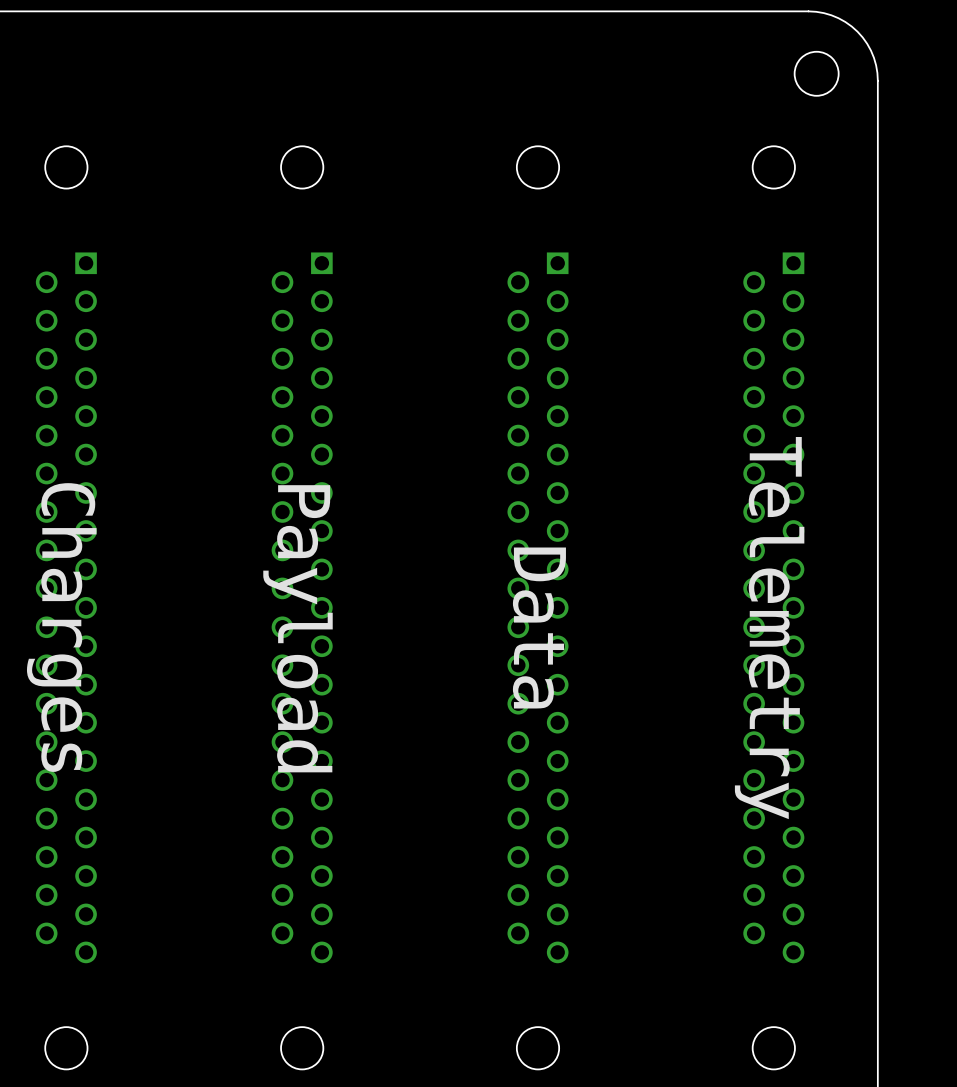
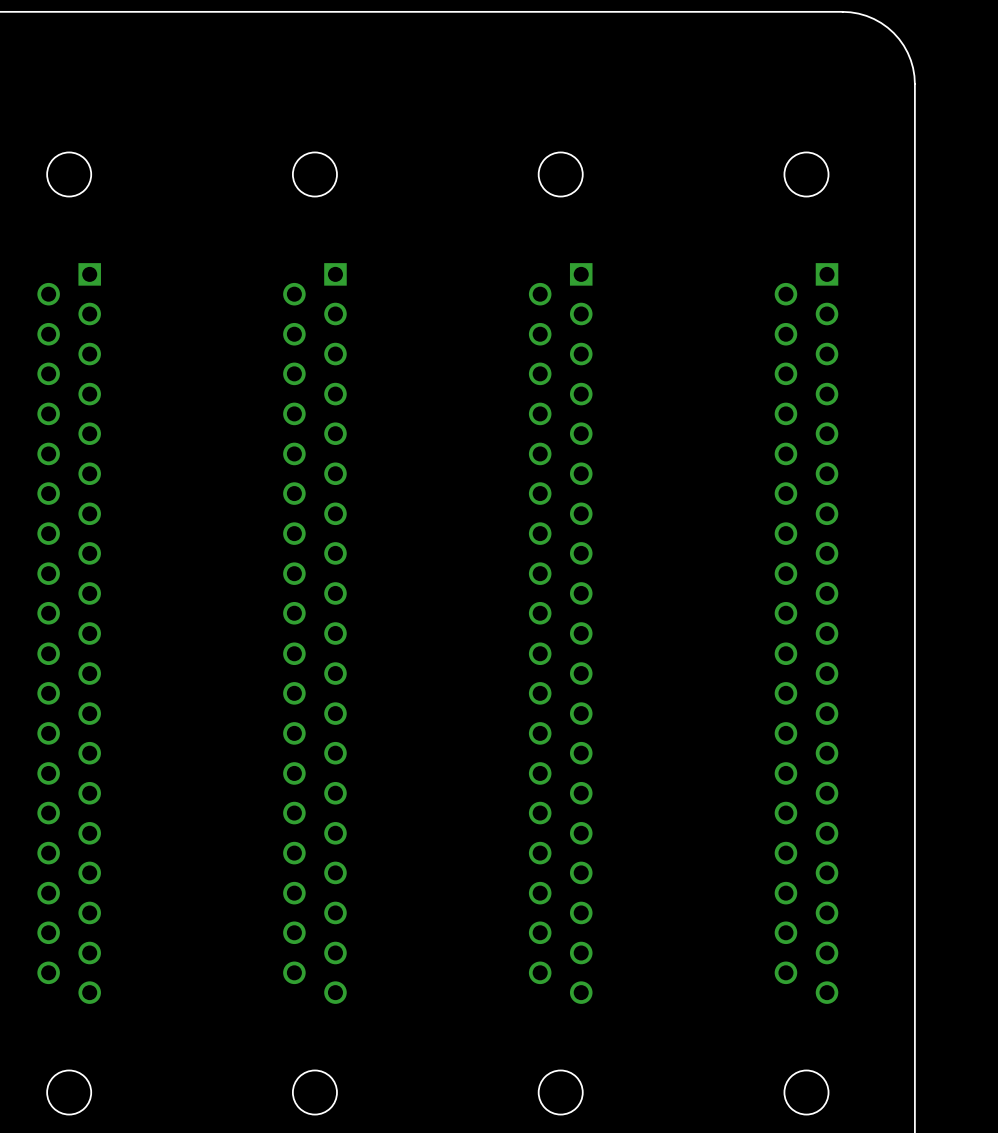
round board edge: [794, 51, 840, 97] -> none
text: Charges (61, 627) -> none
text: Payload (297, 628) -> none
text: Data (539, 628) -> none
text: Telemetry (769, 628) -> none

